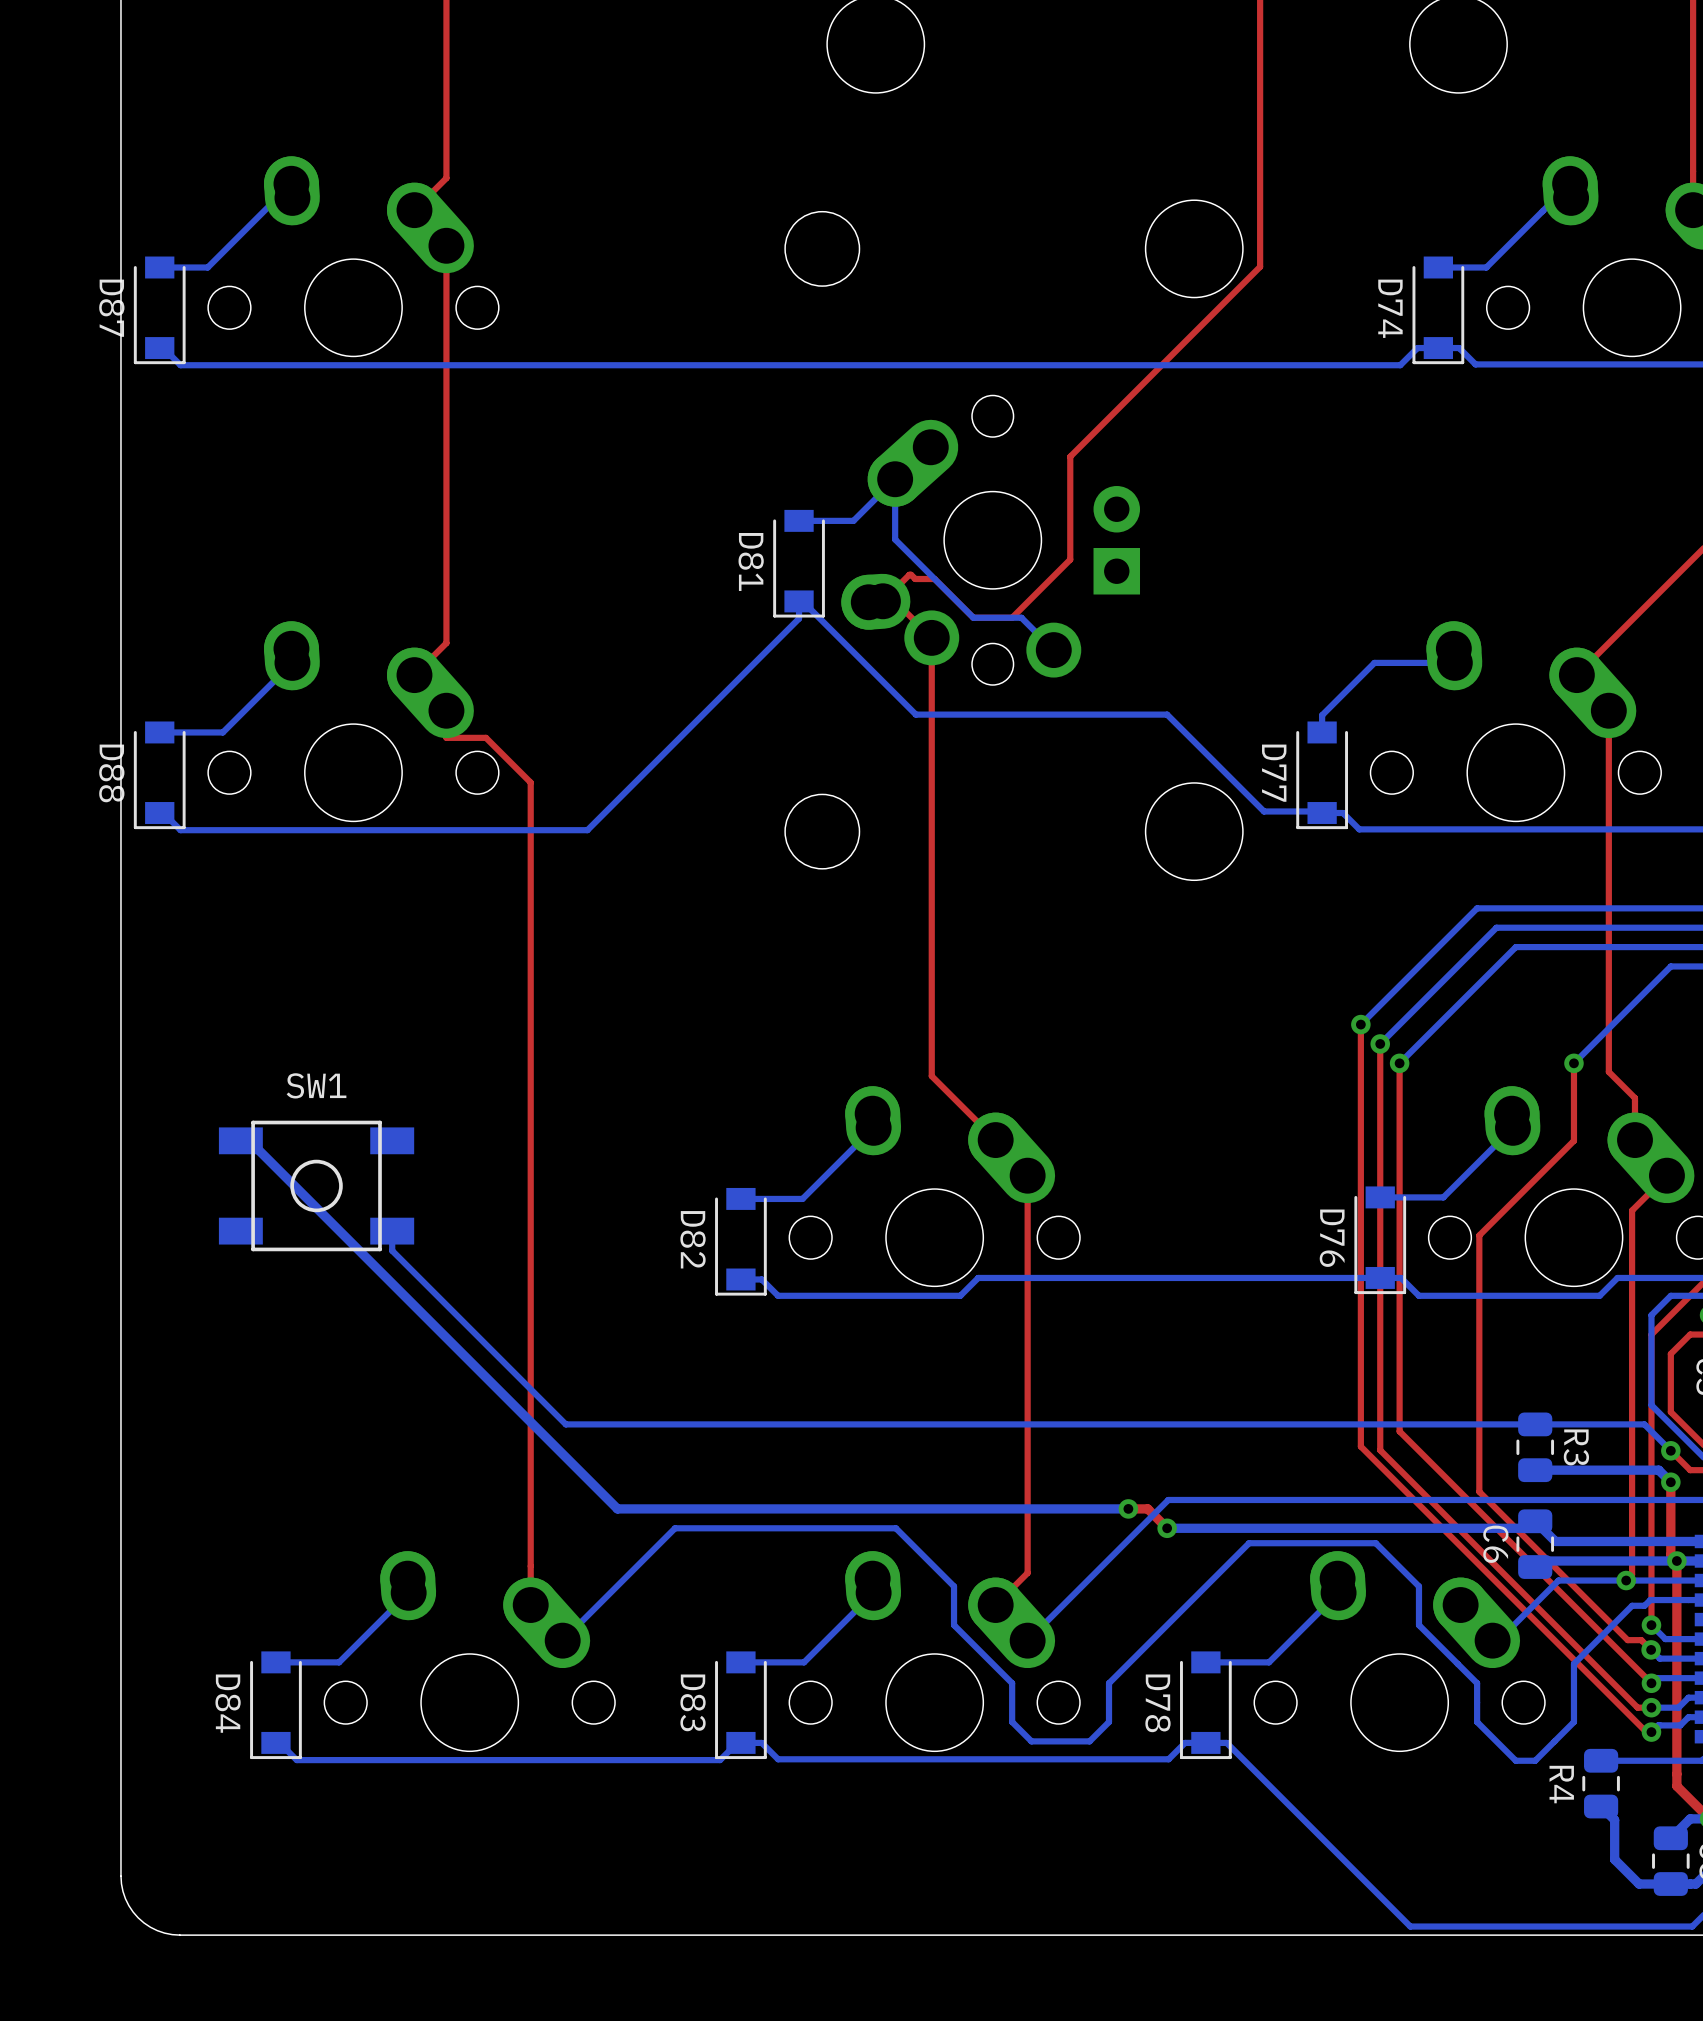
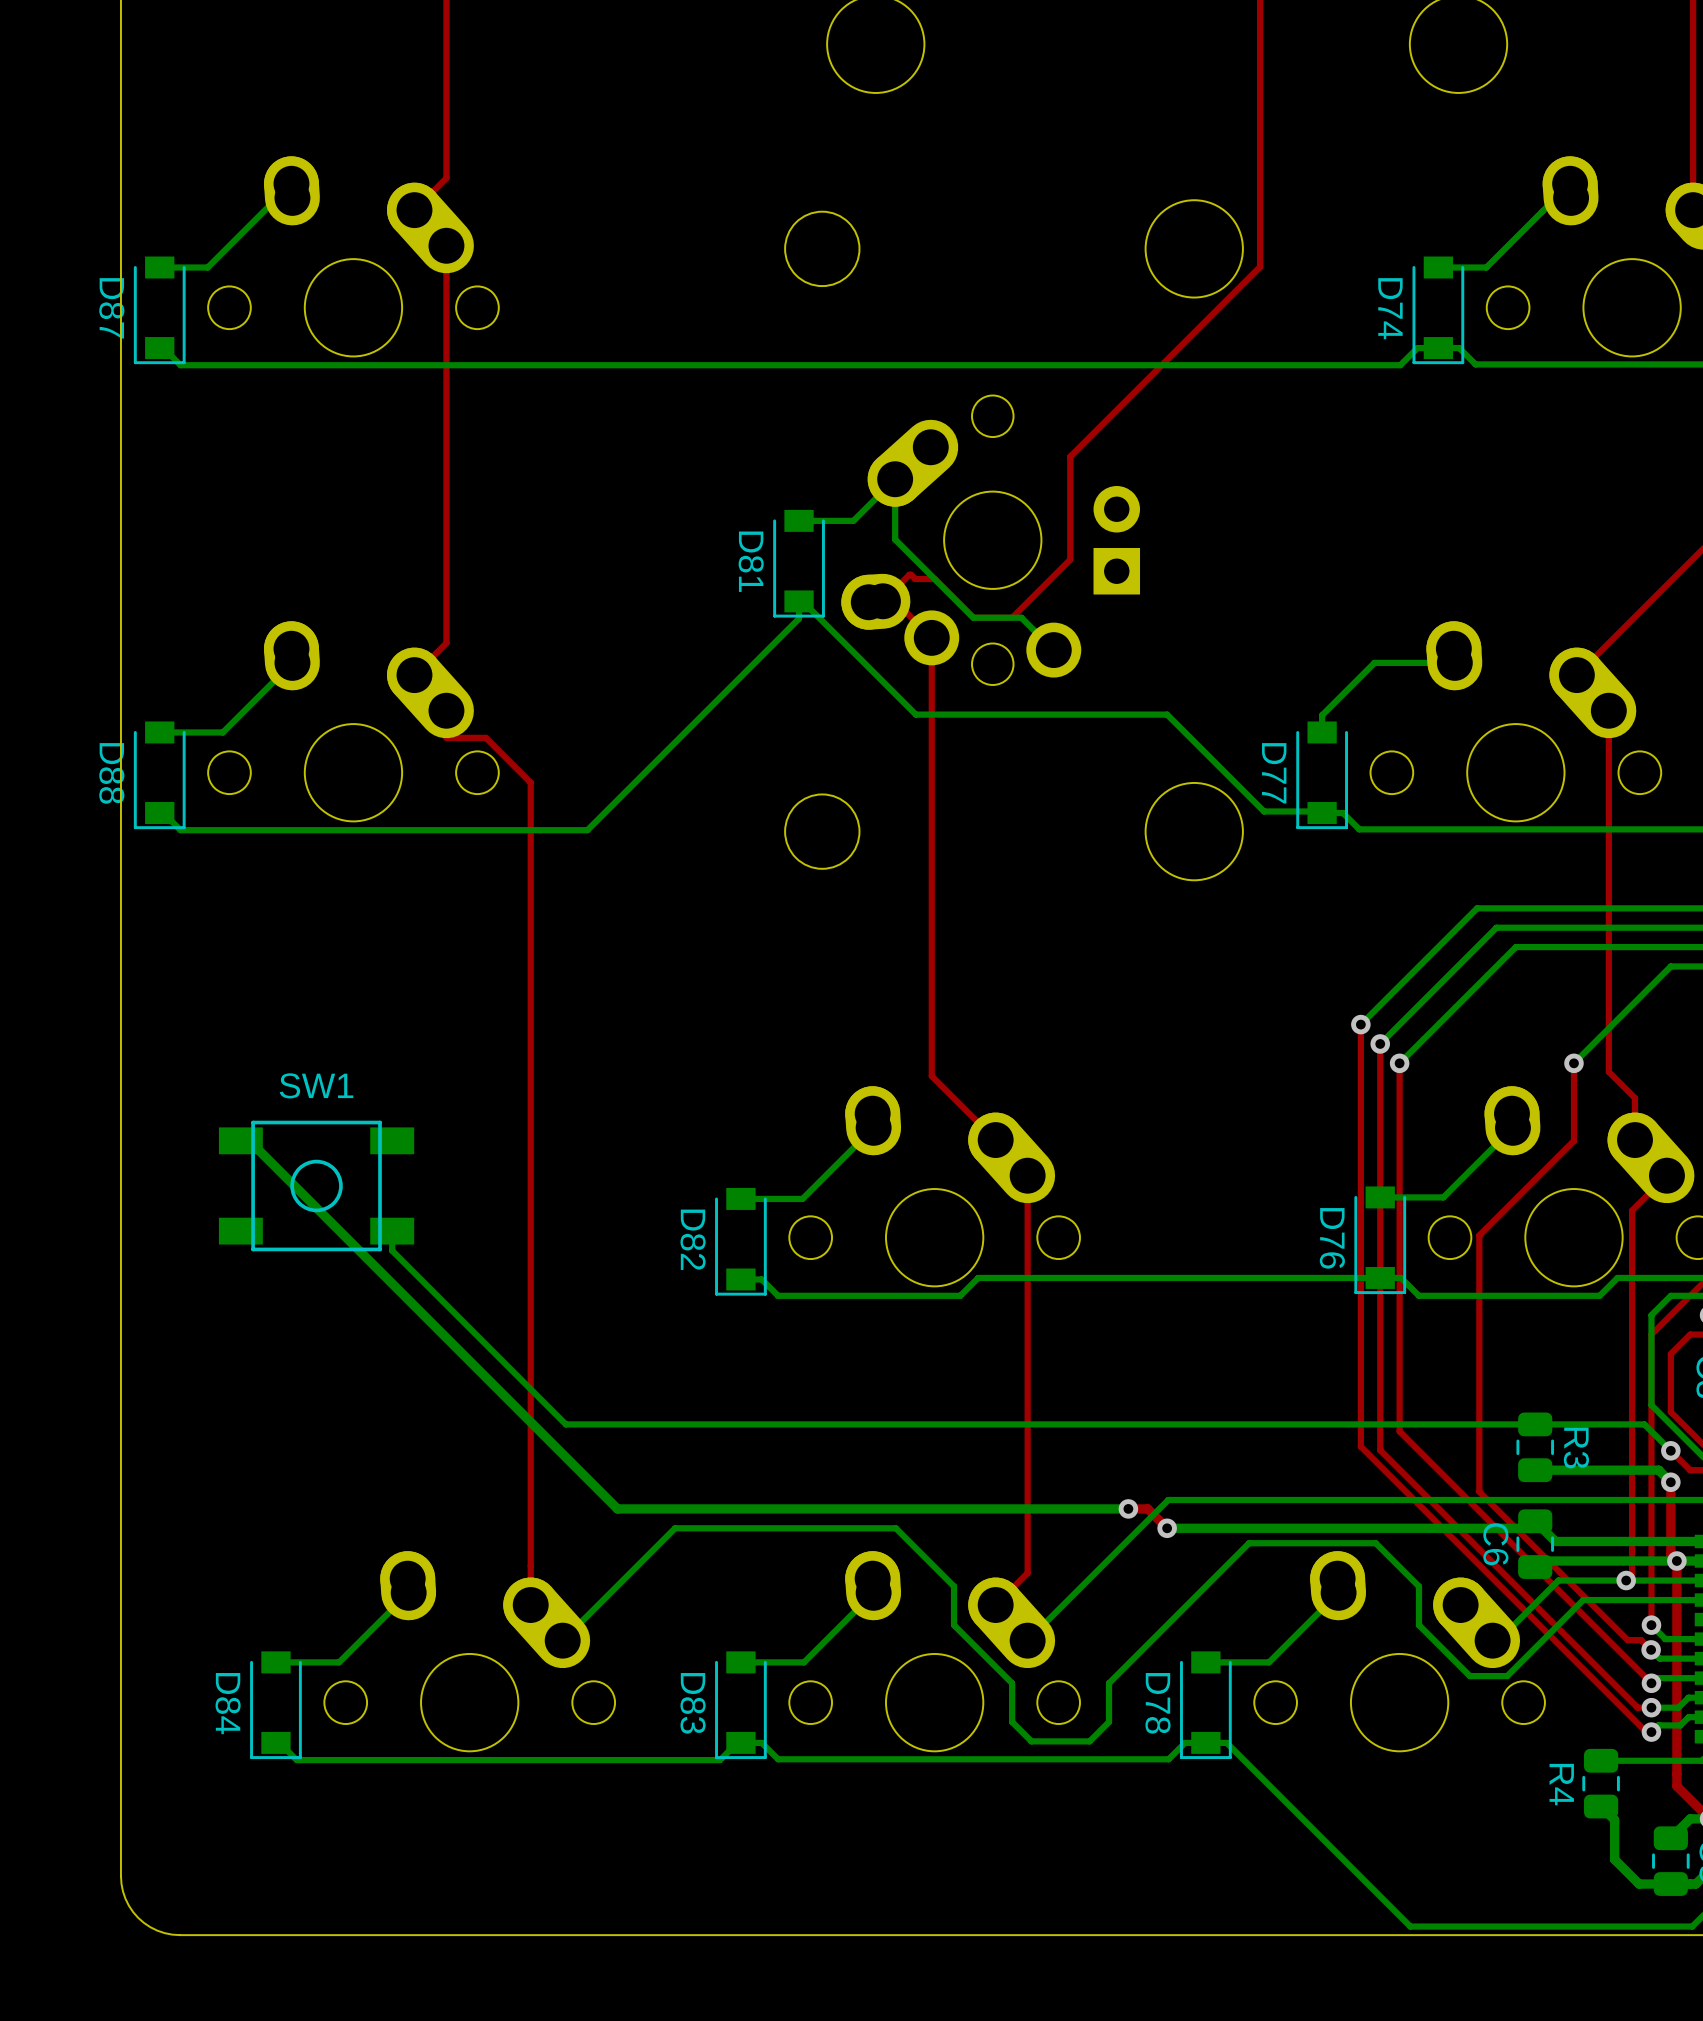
bottom track: (1650, 1600) (1644, 1605) (1632, 1605) (1573, 1663) (1573, 1722) (1535, 1760) (1515, 1760) (1477, 1722) (1477, 1683) (1469, 1676) -> (1650, 1600) (1583, 1600) (1507, 1676) (1469, 1676)

